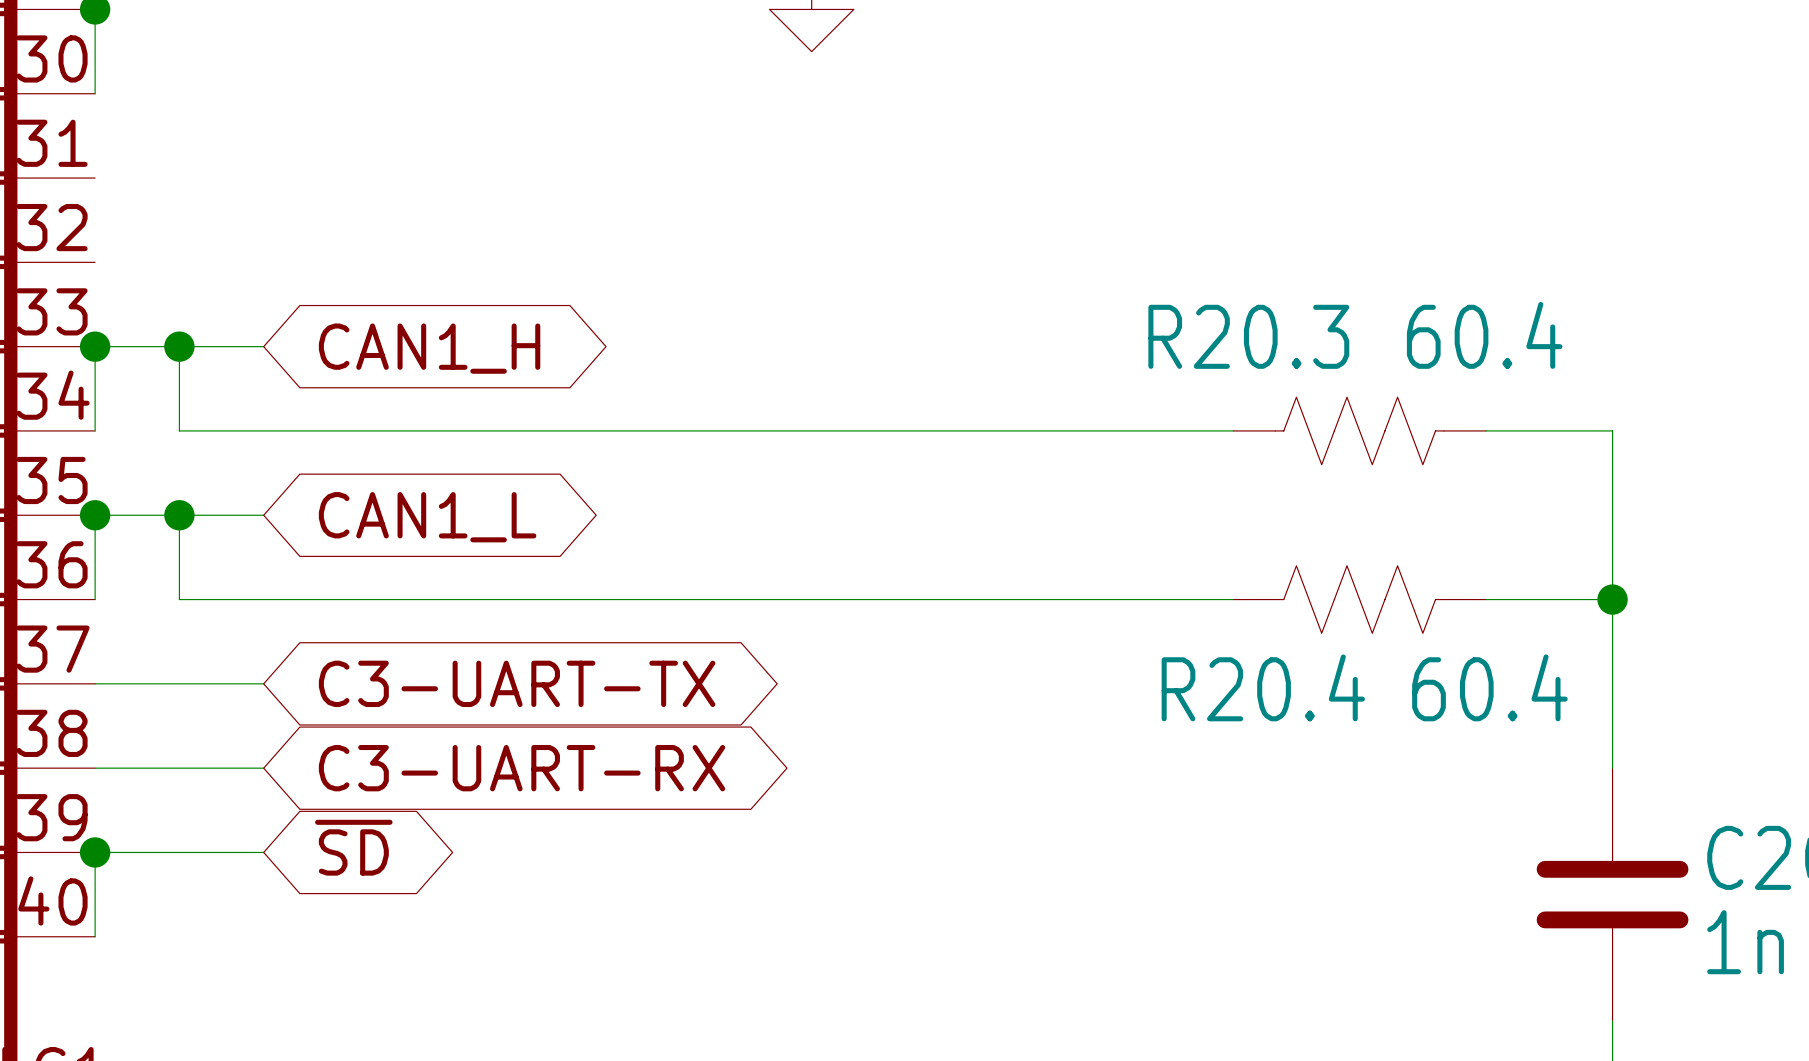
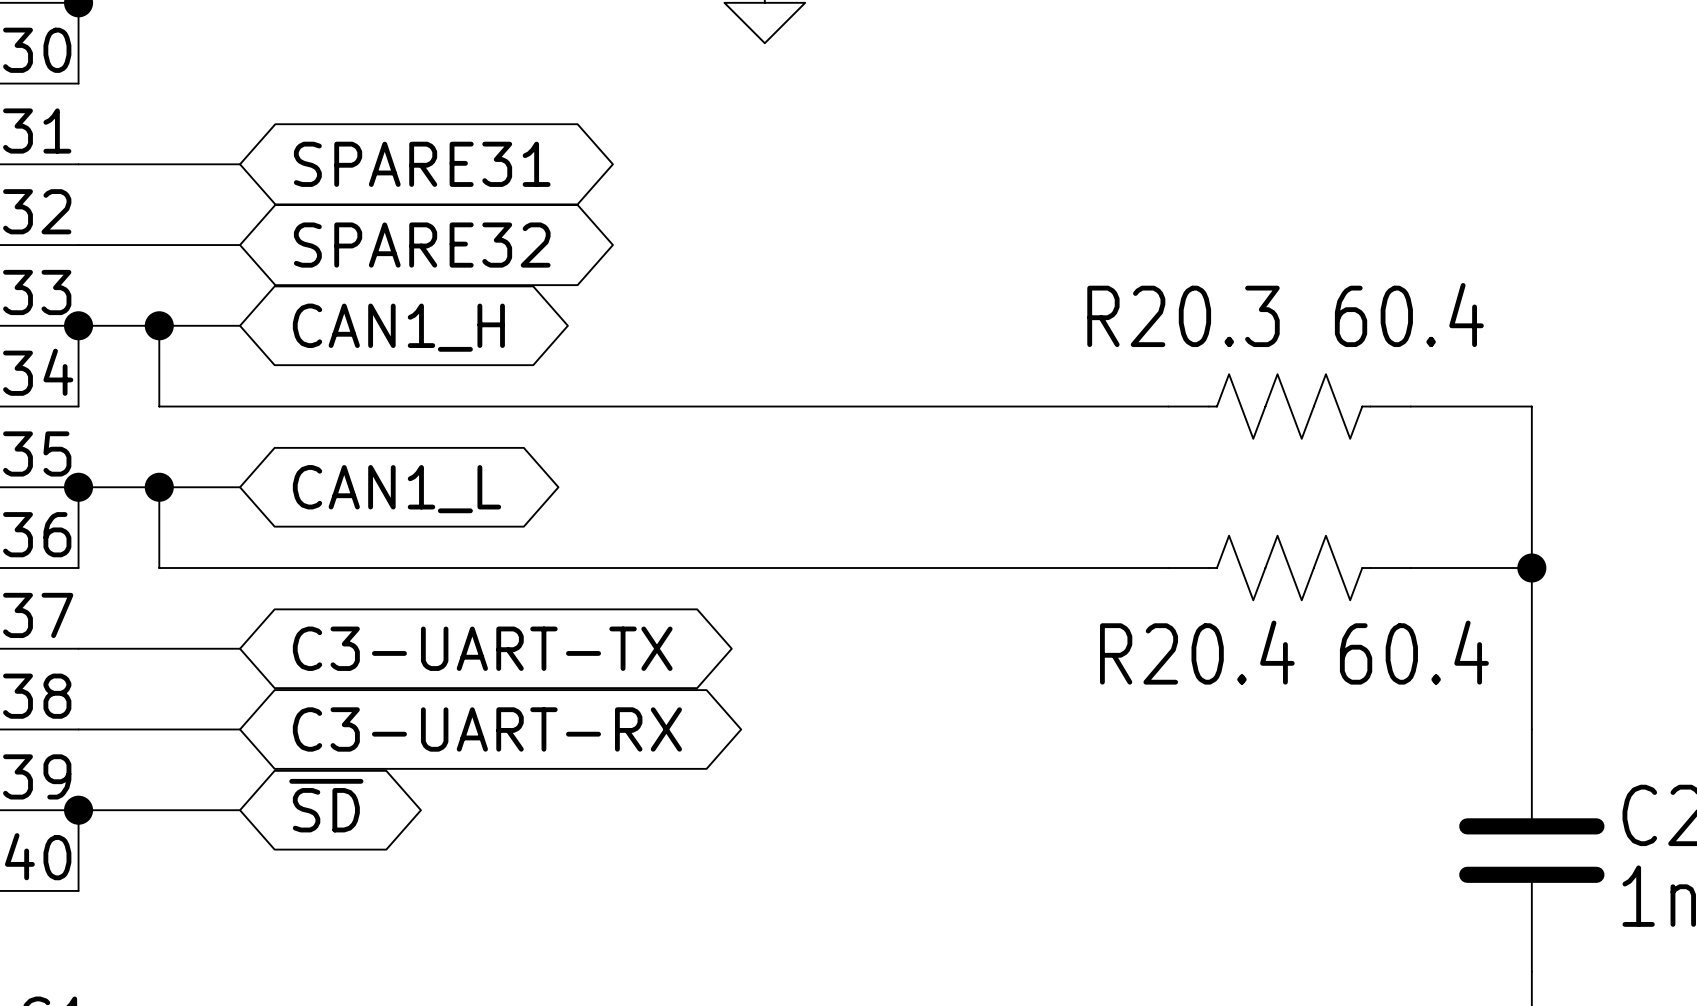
wire: none -> (78, 164) (240, 164)
global label: none -> SPARE31 (422, 164)
wire: none -> (78, 245) (240, 245)
global label: none -> SPARE32 (422, 245)

